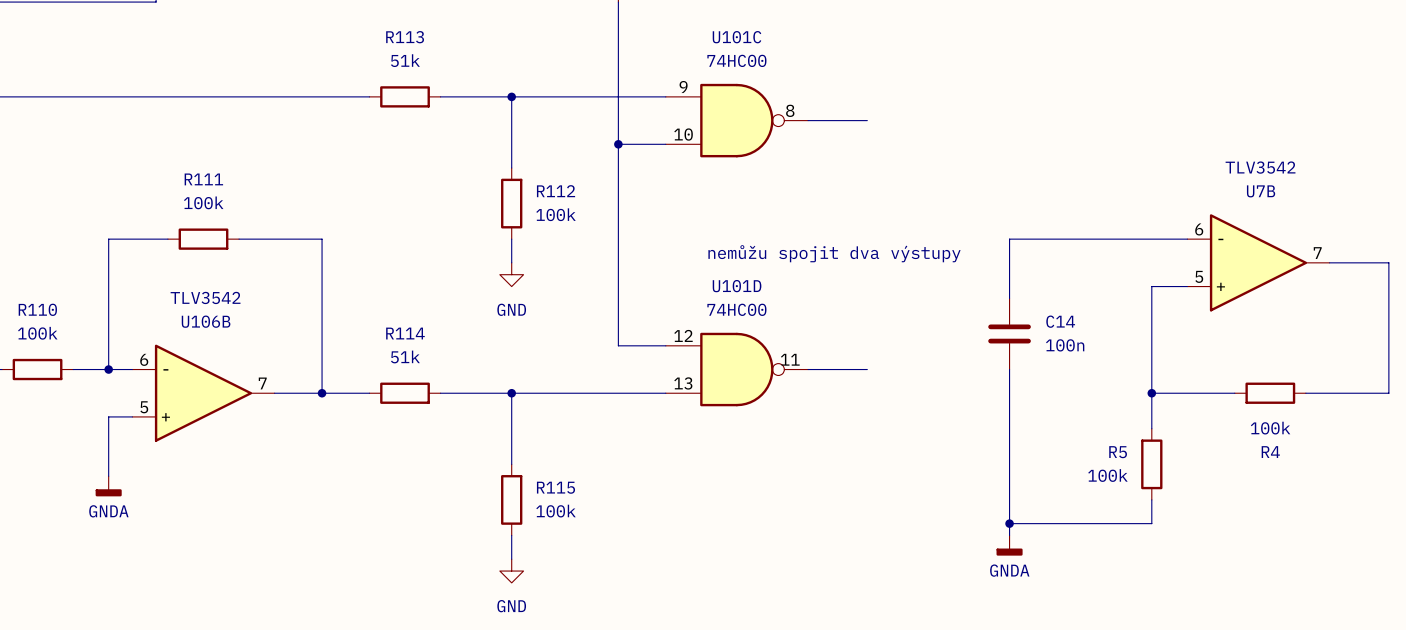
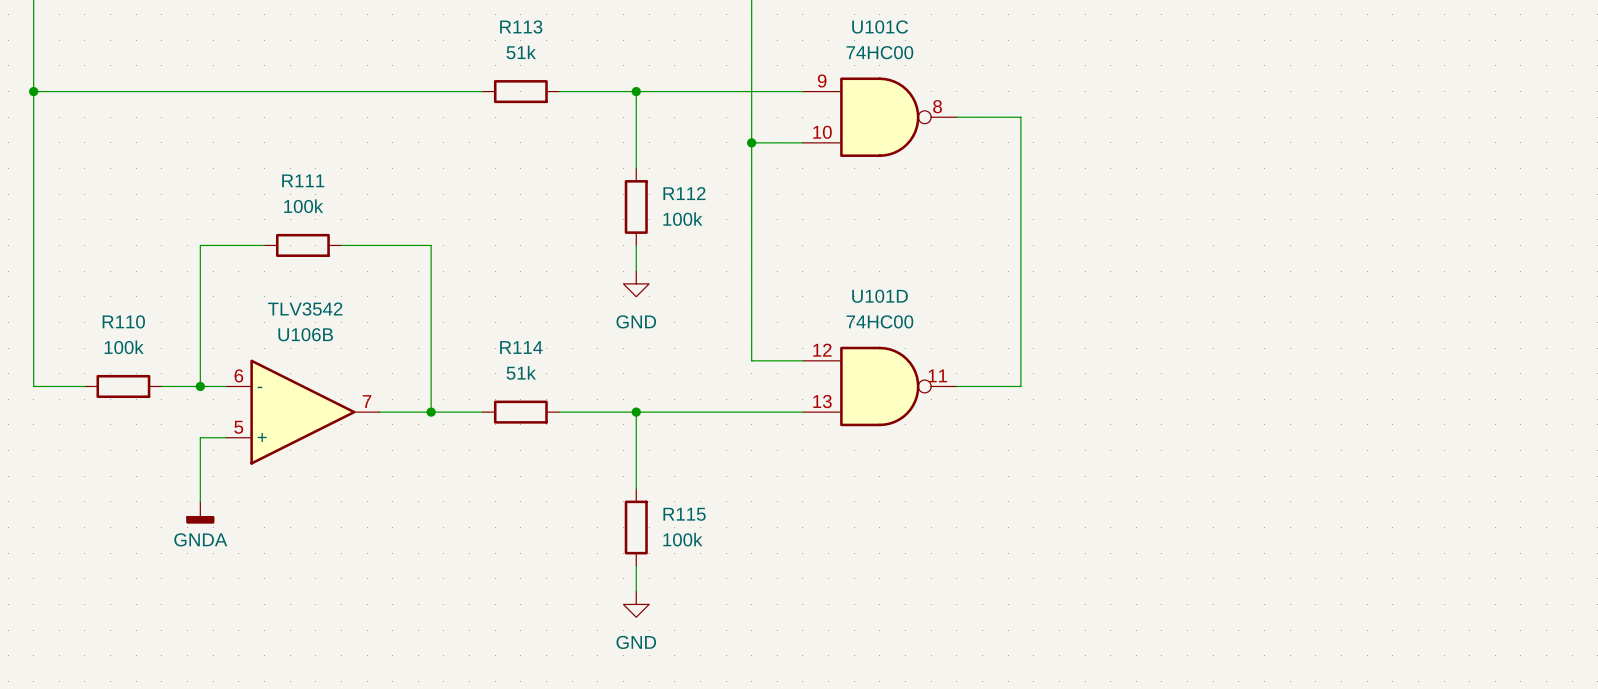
wire: none -> (1020, 117) (1020, 386)
wire: (1187, 239) (1009, 239) (1009, 298) -> none
text: nemůžu spojit dva výstupy (834, 253) -> none
U7B: TLV3542 (1258, 262) -> none
wire: (1329, 262) (1388, 262) (1388, 393) (1305, 393) -> none
wire: (1187, 286) (1151, 286) (1151, 428) -> none
C14: 100n (1009, 333) -> none
wire: (1009, 369) (1009, 535) -> none
wire: (1151, 393) (1234, 393) -> none
junction: (1151, 393) -> none
R4: 100k (1270, 393) -> none
R5: 100k (1151, 464) -> none
wire: (1151, 499) (1151, 523) (1009, 523) -> none
junction: (1009, 523) -> none
power symbol: GNDA (1009, 545) -> none

